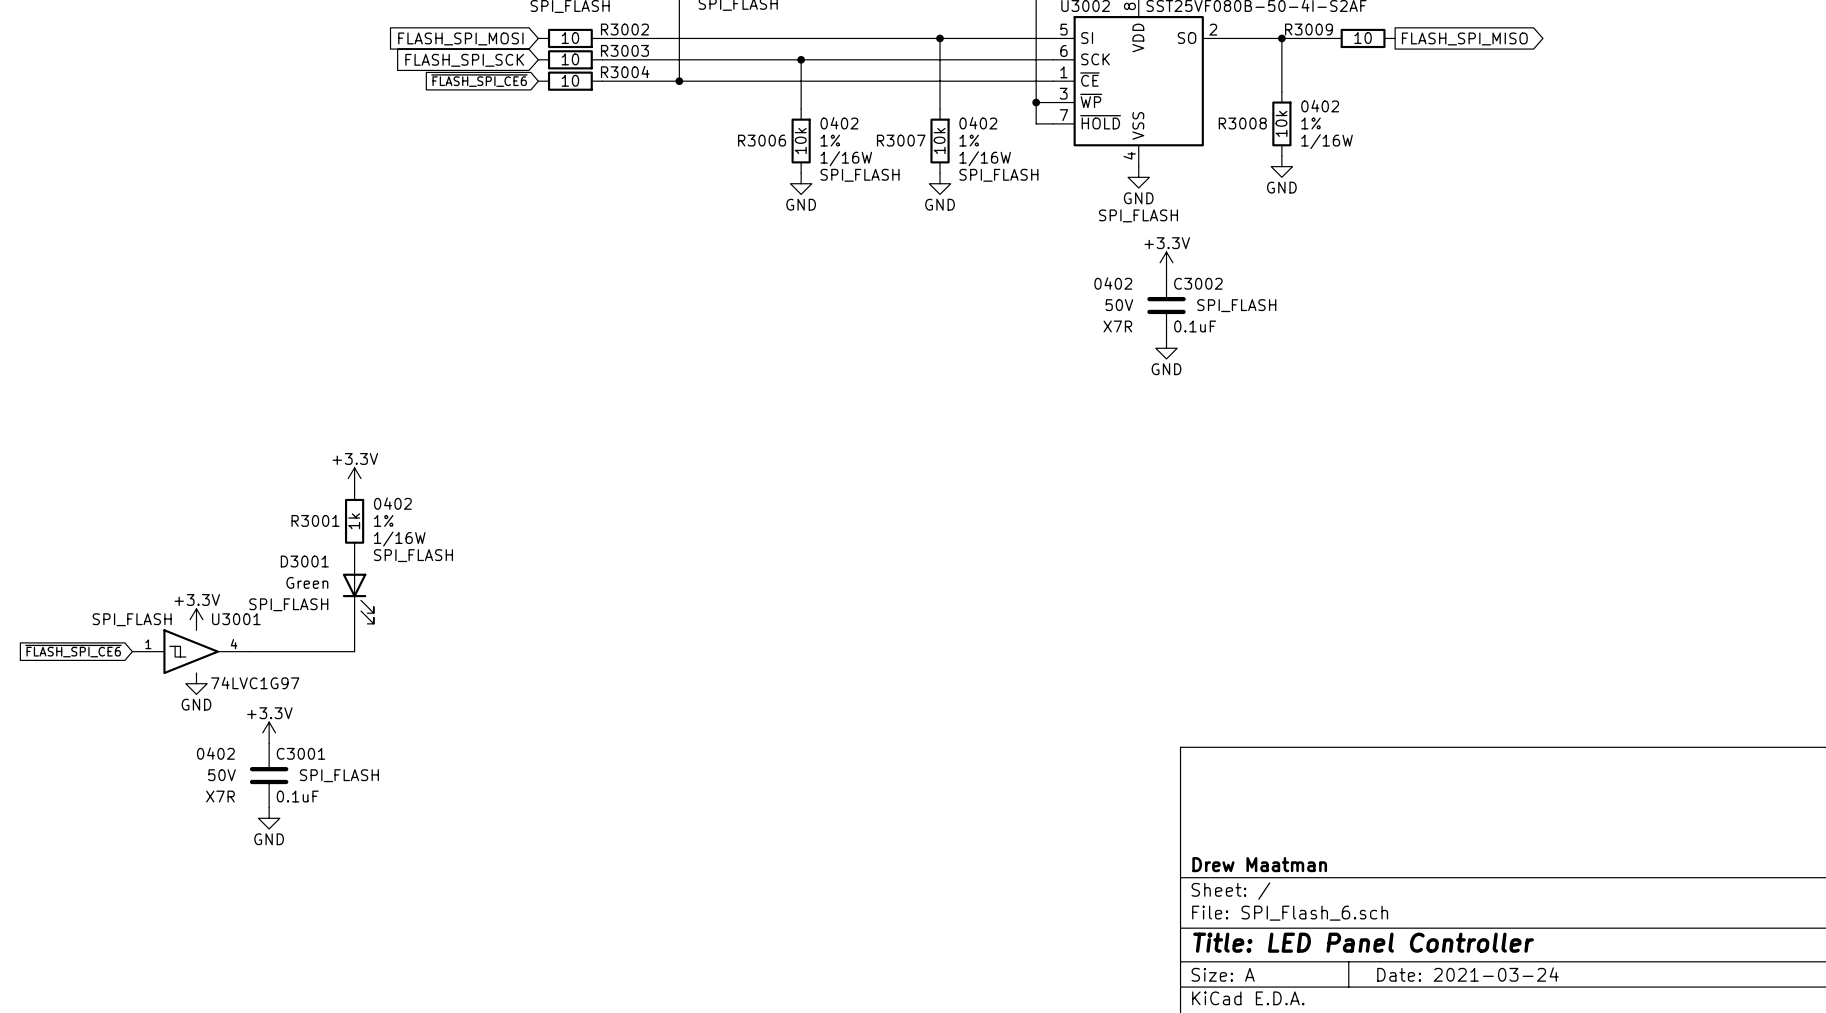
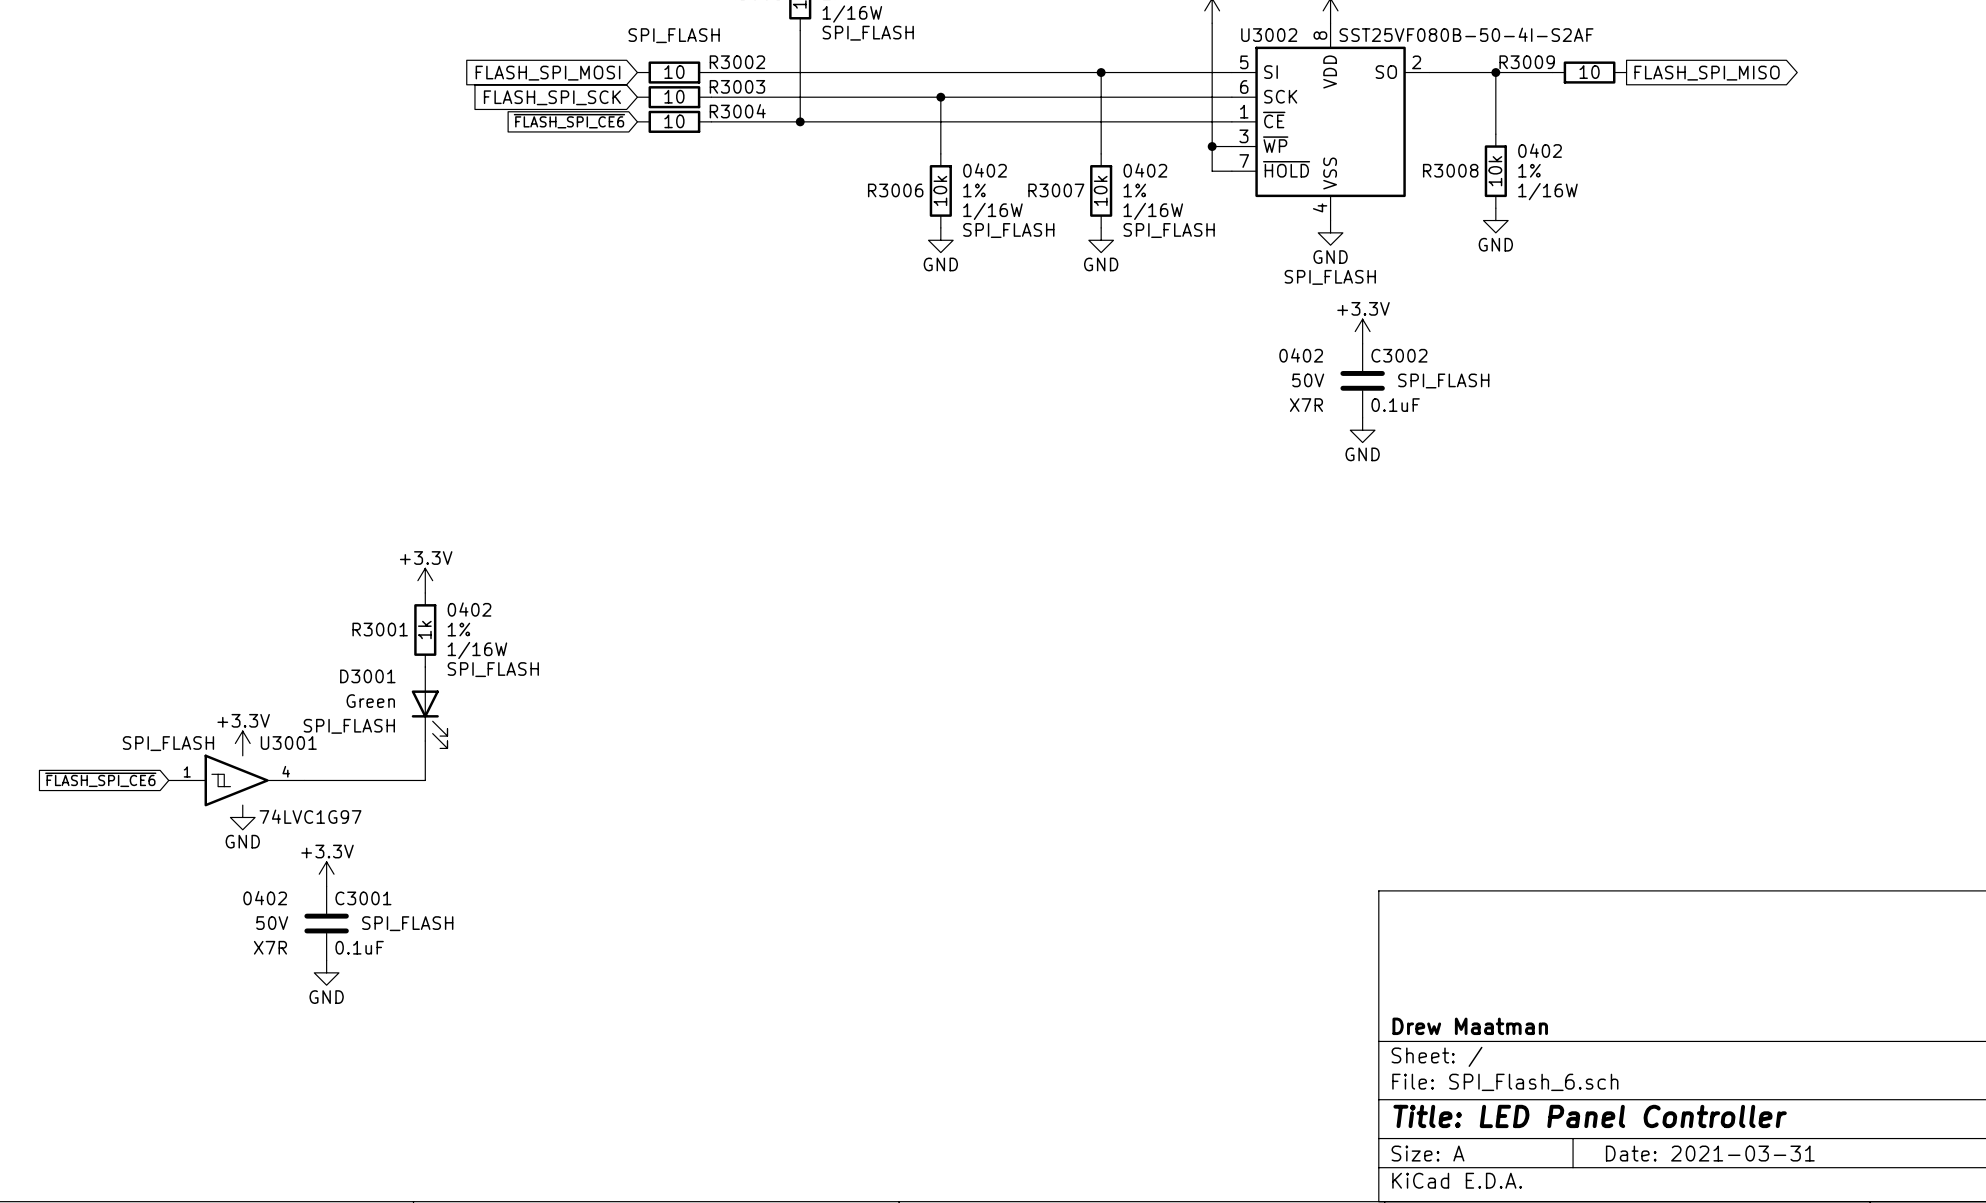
title block: Date: 2021-03-24 (1467, 974) -> Date: 2021-03-31 (1710, 1153)

